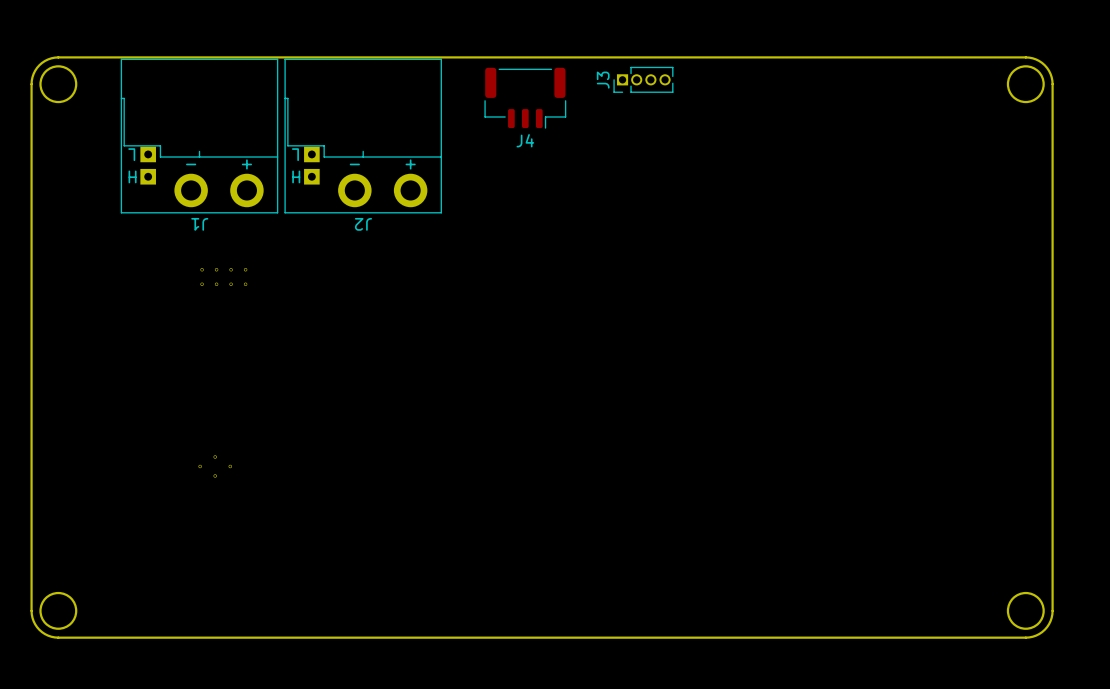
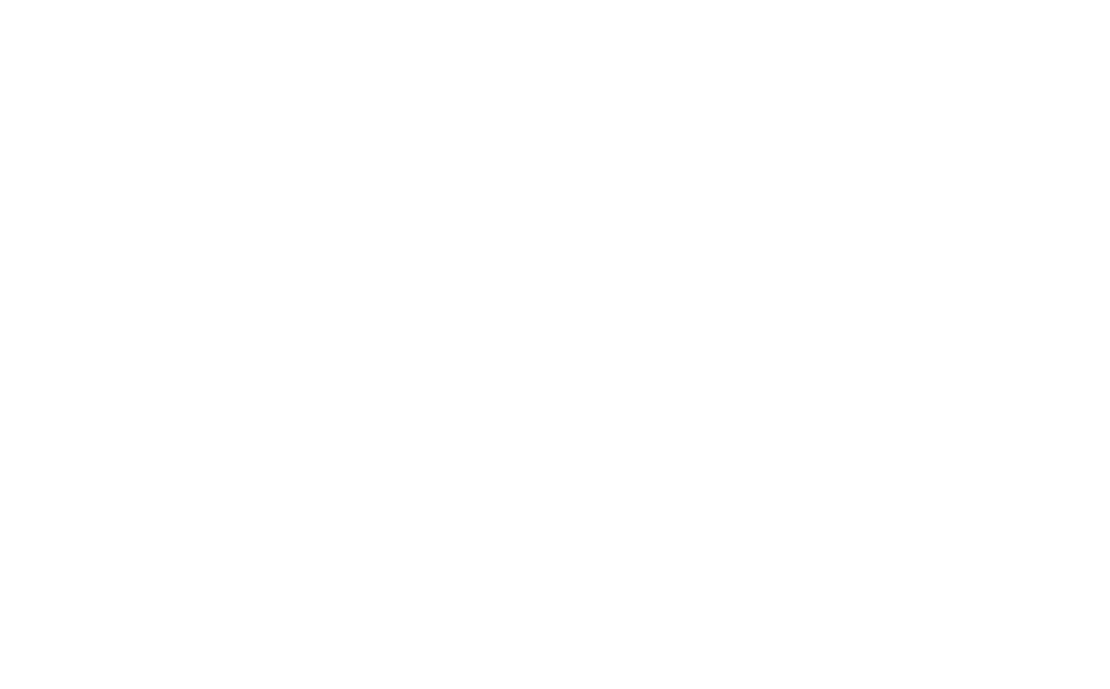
board edge: (58, 57) (1025, 57) (1039, 60) (1049, 70) (1052, 84) (1052, 610) (1049, 624) (1039, 634) (1025, 637) (58, 637) (44, 634) (35, 624) (31, 610) (31, 84) (33, 73) (39, 65) (48, 59) (58, 57) -> none
round board edge: [39, 65, 78, 104] -> none
round board edge: [1006, 65, 1045, 104] -> none
J3: (643, 79) -> none
J4: (525, 98) -> none
J1: (199, 136) -> none
J2: (363, 136) -> none
part: (223, 277) -> none
part: (215, 466) -> none
round board edge: [39, 591, 78, 630] -> none
round board edge: [1006, 591, 1045, 630] -> none

